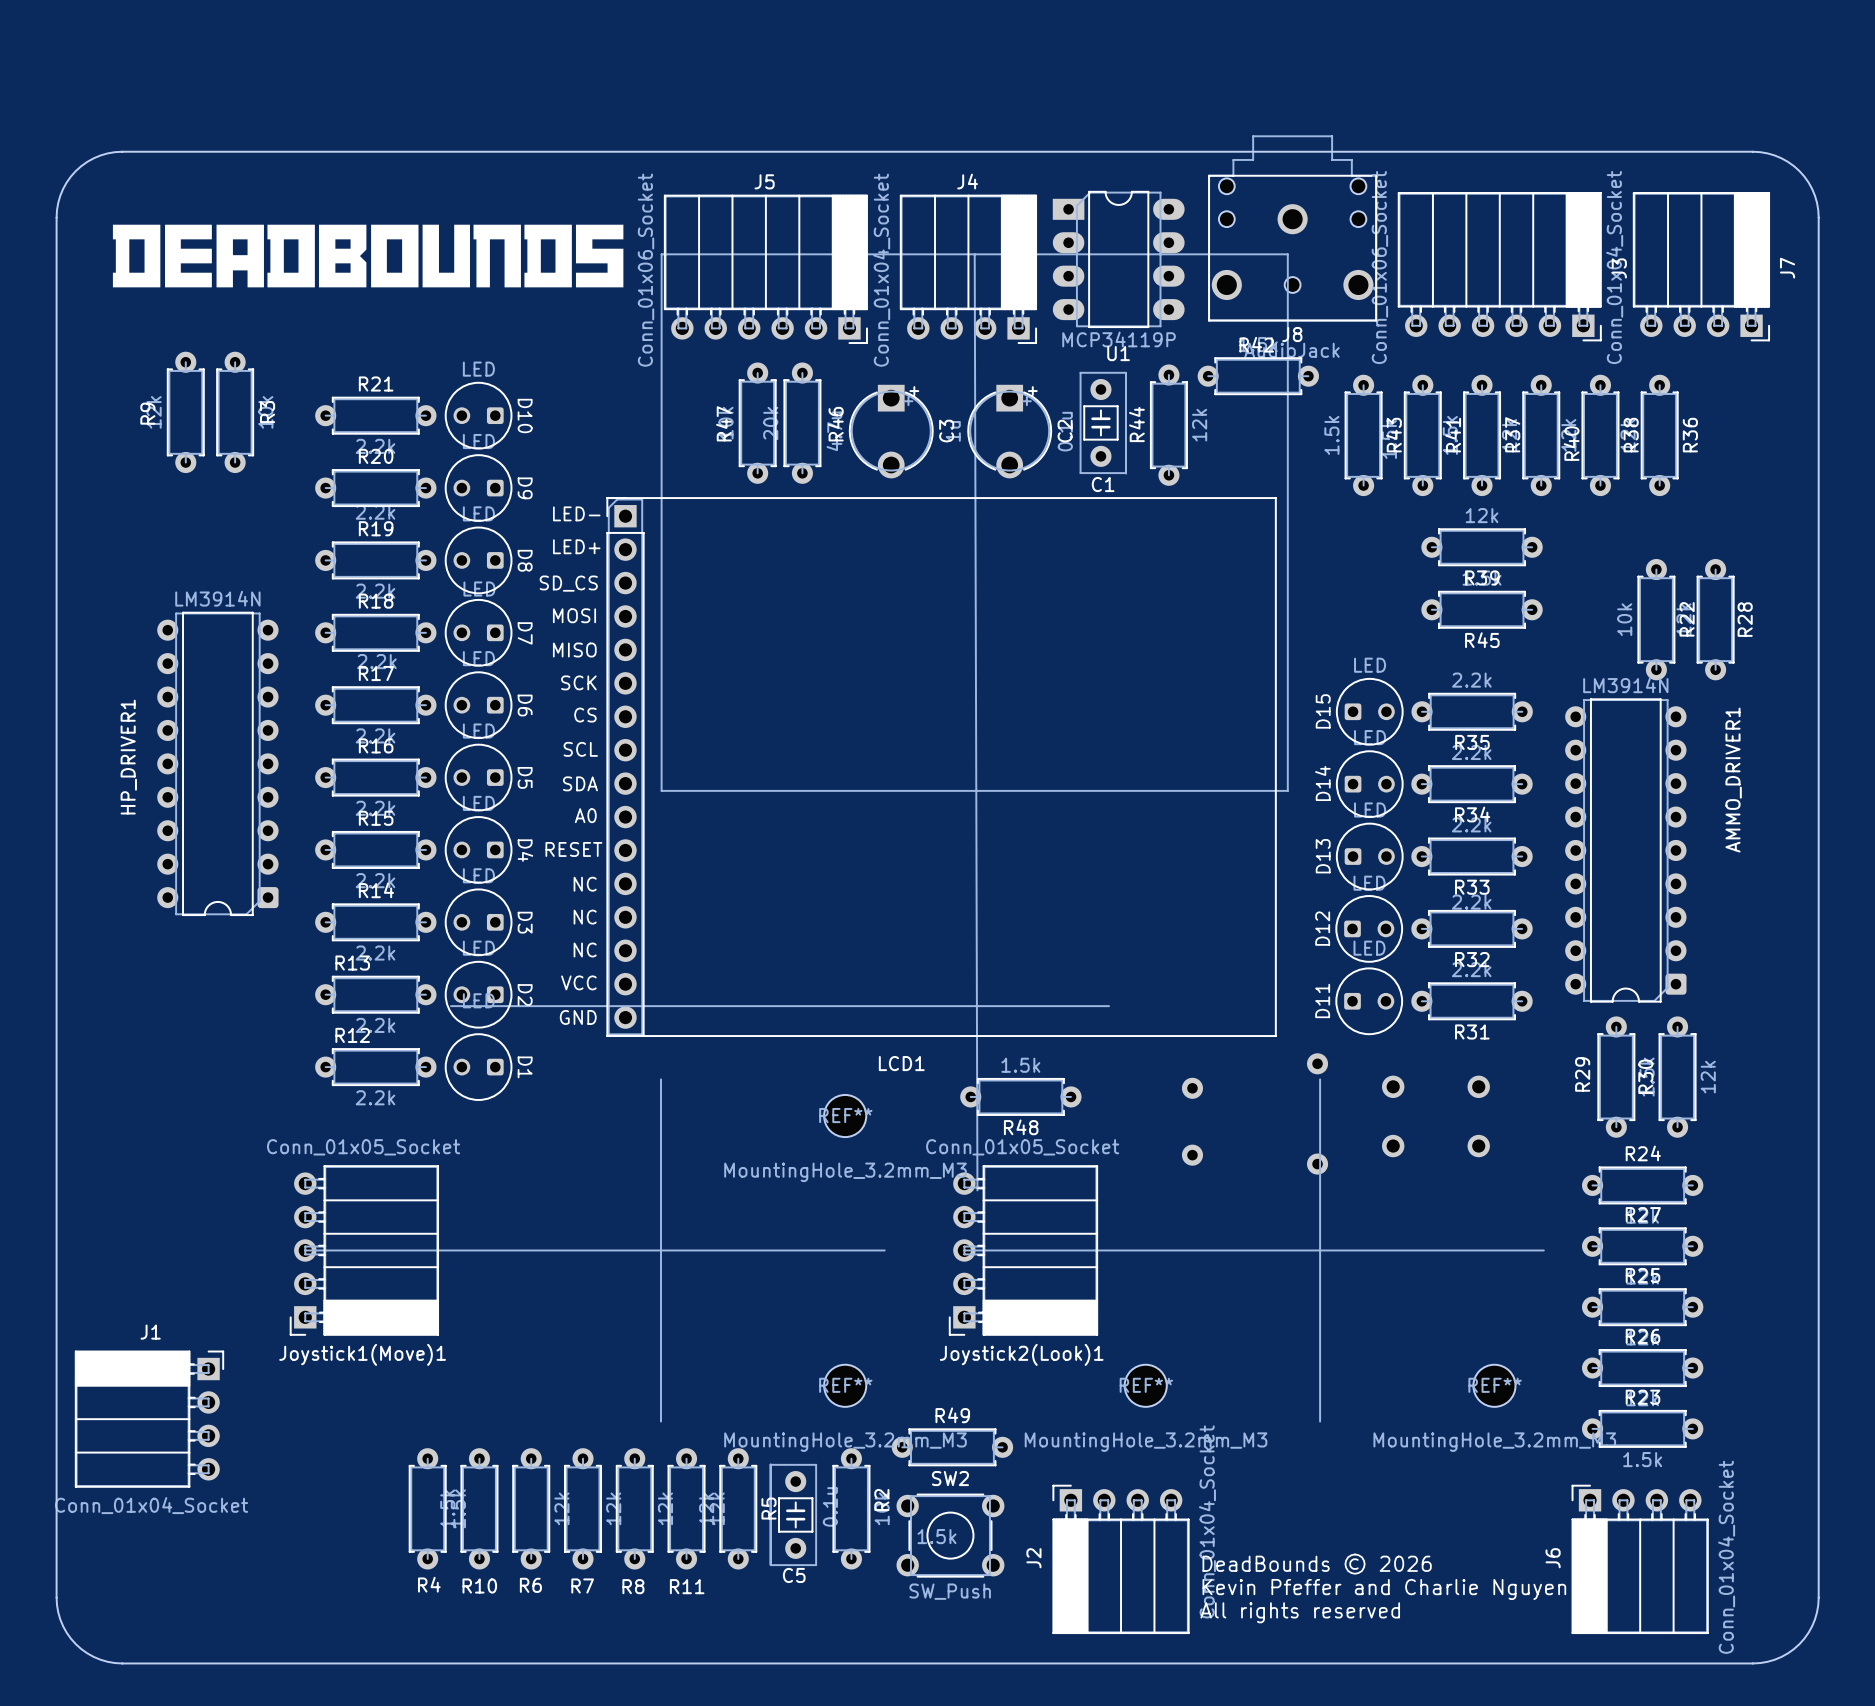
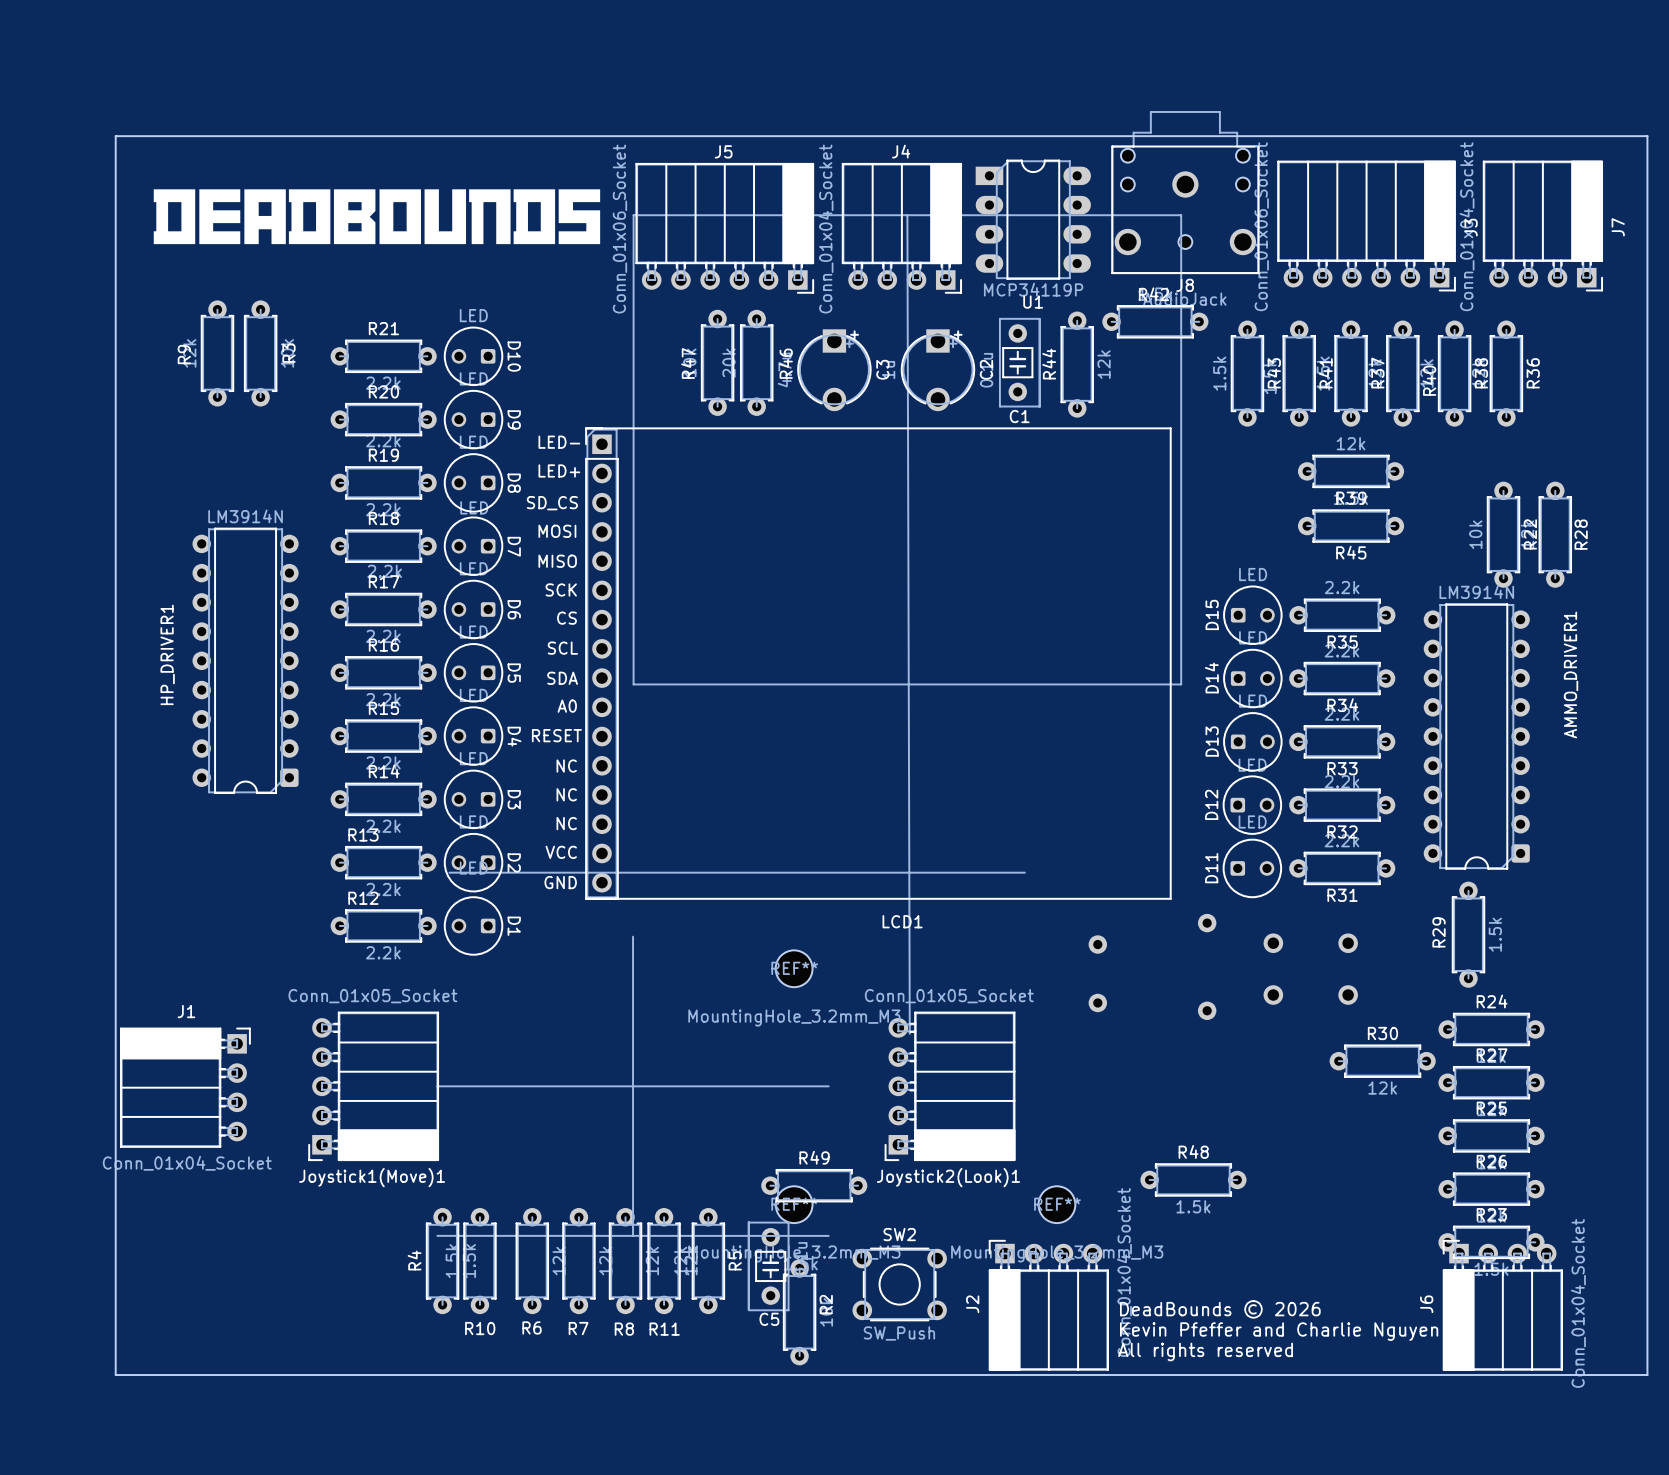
board edge: (122, 151) (1752, 151) (1774, 155) (1793, 166) (1804, 176) (1812, 188) (1817, 202) (1818, 217) (1818, 1597) (1815, 1619) (1804, 1638) (1793, 1649) (1781, 1656) (1767, 1661) (1752, 1663) (122, 1663) (100, 1659) (81, 1649) (70, 1638) (63, 1626) (58, 1612) (56, 1597) (56, 217) (60, 195) (66, 182) (75, 171) (87, 161) (100, 155) (122, 151) -> (115, 136) (115, 1375) (1647, 1375) (1647, 136) (115, 136)
LCD1 name position: LCD1 (901, 1063) -> LCD1 (902, 921)
R48 value position: 1.5k (1020, 1065) -> 1.5k (1193, 1206)
R30 rotation: 0° (1677, 1077) -> 90° clockwise (1382, 1061)
R30 position: (1677, 1077) -> (1382, 1061)
line: (1320, 1079) (1320, 1421) -> none
R48 position: (1020, 1096) -> (1193, 1179)
R48 name position: R48 (1021, 1127) -> R48 (1193, 1151)
line: (305, 1250) (437, 1250) -> none
line: (964, 1250) (1543, 1250) -> none
REF**: MountingHole_3.2mm_M3 (1494, 1385) -> none
J1 position: (149, 1419) -> (185, 1087)
line: none -> (437, 1235) (828, 1235)
R49 position: (952, 1447) -> (814, 1185)
R4 position: (427, 1508) -> (442, 1261)
R10 position: (479, 1508) -> (479, 1261)
R6 position: (531, 1508) -> (532, 1261)
R7 position: (583, 1508) -> (578, 1261)
R8 position: (634, 1508) -> (625, 1261)
R11 position: (686, 1508) -> (664, 1261)
R5 position: (738, 1508) -> (708, 1261)
C5 position: (793, 1514) -> (768, 1266)
SW2 position: (950, 1535) -> (899, 1284)
J2 position: (1121, 1559) -> (1048, 1305)
J6 position: (1640, 1559) -> (1502, 1305)
text position: DeadBounds © 2026 (1317, 1564) -> DeadBounds © 2026 (1220, 1309)
R4 name rotation: 0° (429, 1584) -> 90° counterclockwise (414, 1260)
R4 name position: R4 (429, 1584) -> R4 (414, 1260)
text position: Kevin Pfeffer and Charlie Nguyen (1384, 1589) -> Kevin Pfeffer and Charlie Nguyen (1279, 1331)
text position: All rights reserved (1300, 1612) -> All rights reserved (1205, 1351)

